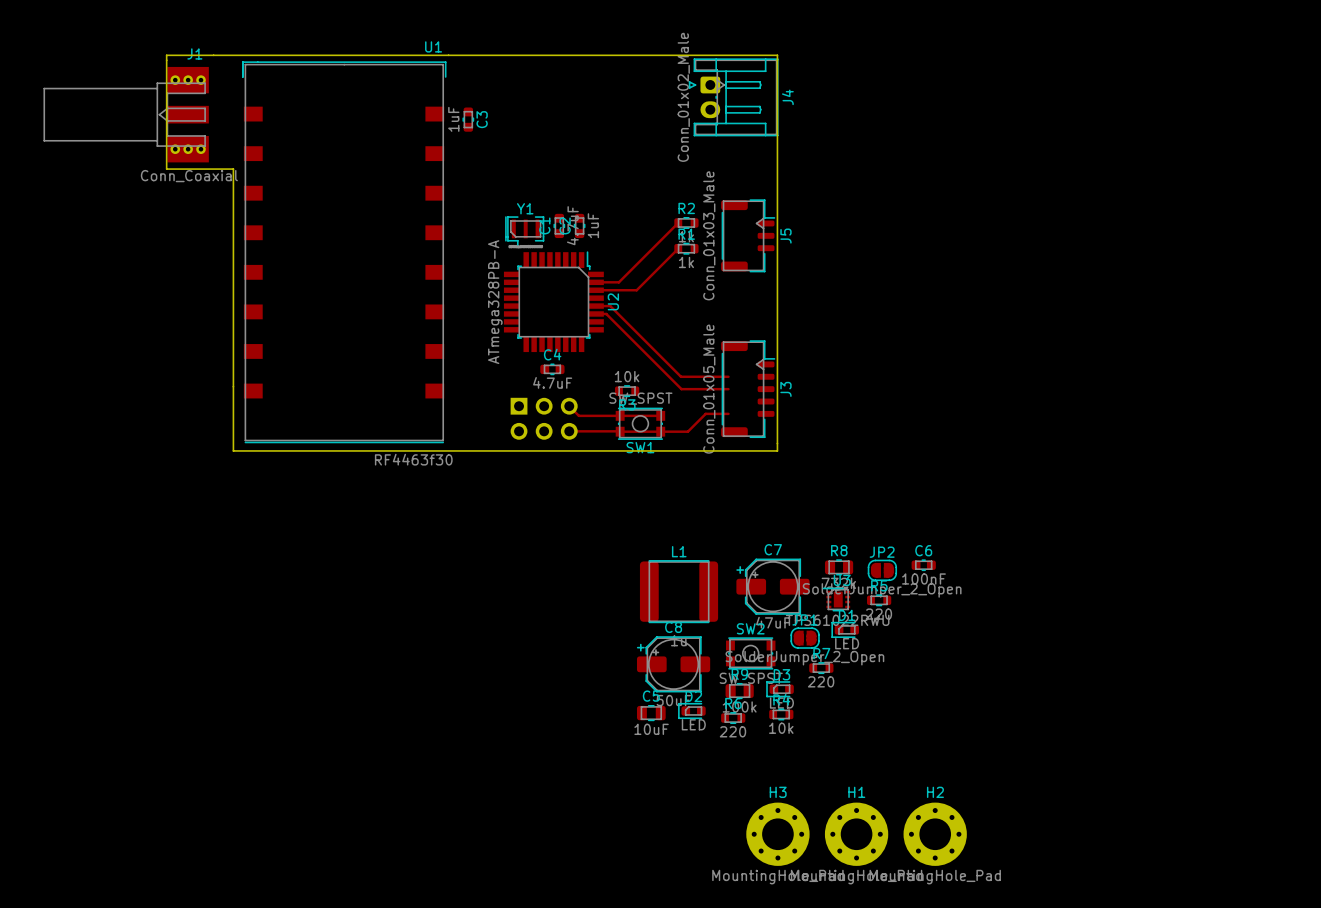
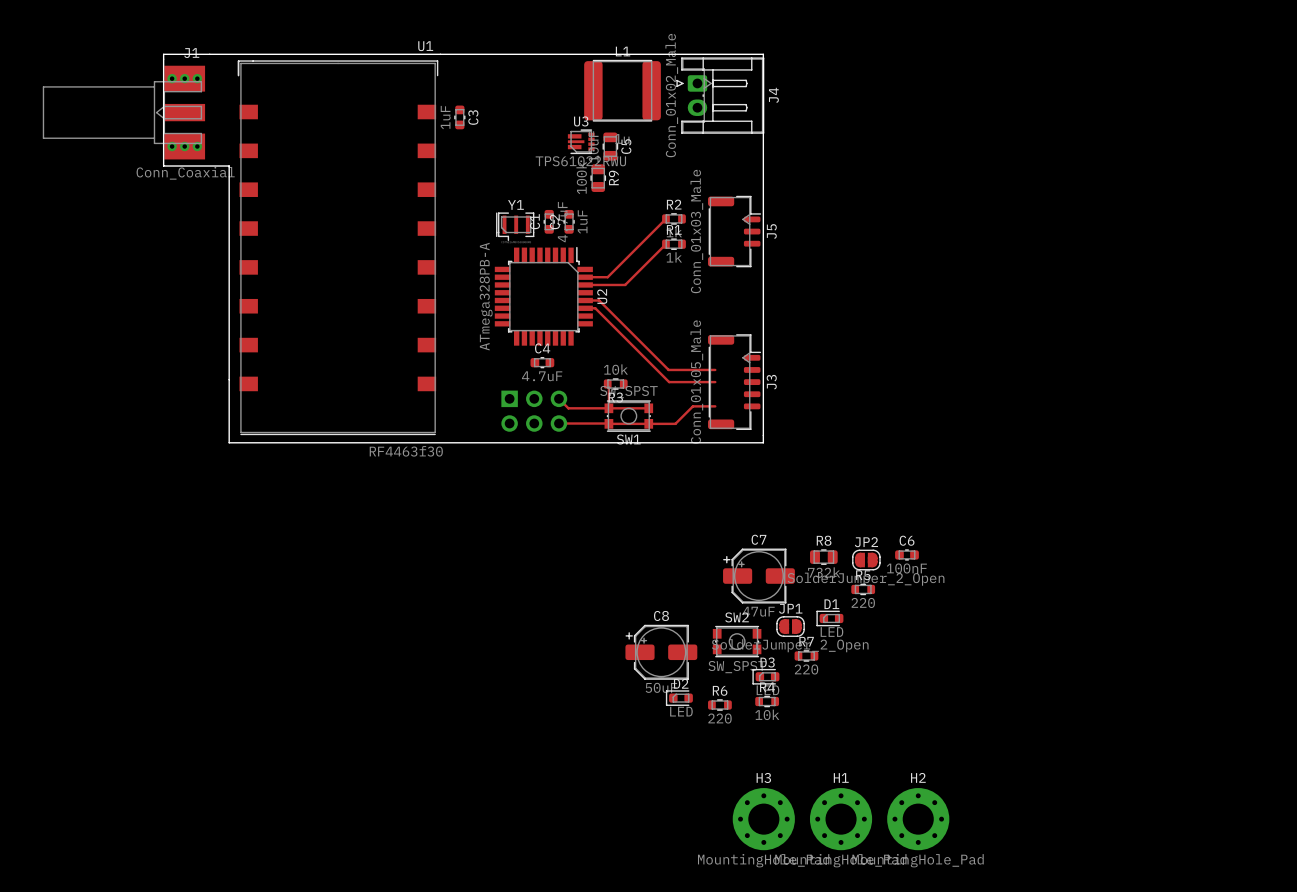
U3 footprint: [822, 587, 851, 612] -> [567, 129, 595, 155]
L1 position: (679, 591) -> (622, 90)
R9 rotation: 0° (739, 691) -> 90° clockwise (598, 178)
R9 position: (739, 691) -> (598, 178)
C5 rotation: 0° (651, 713) -> 90° clockwise (610, 146)
C5 position: (651, 713) -> (610, 146)

